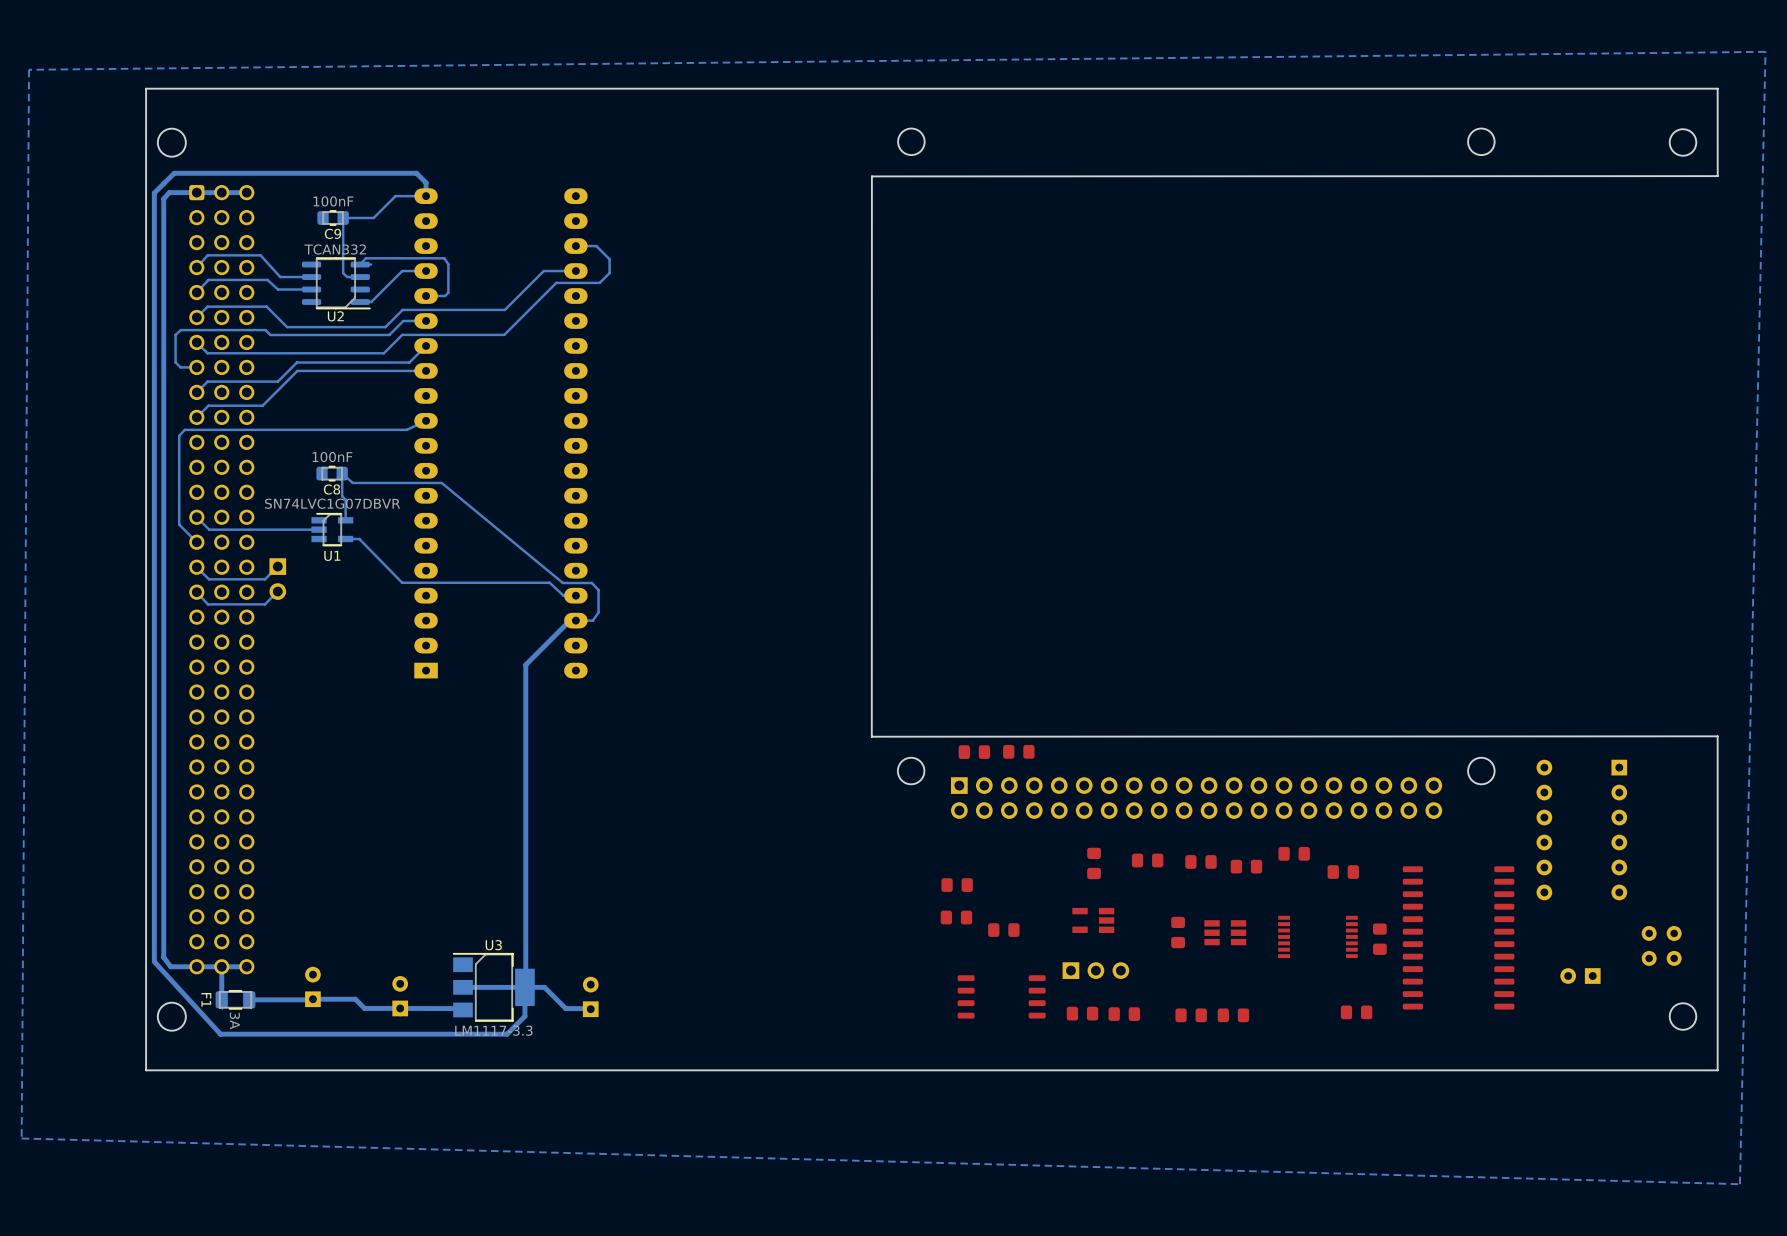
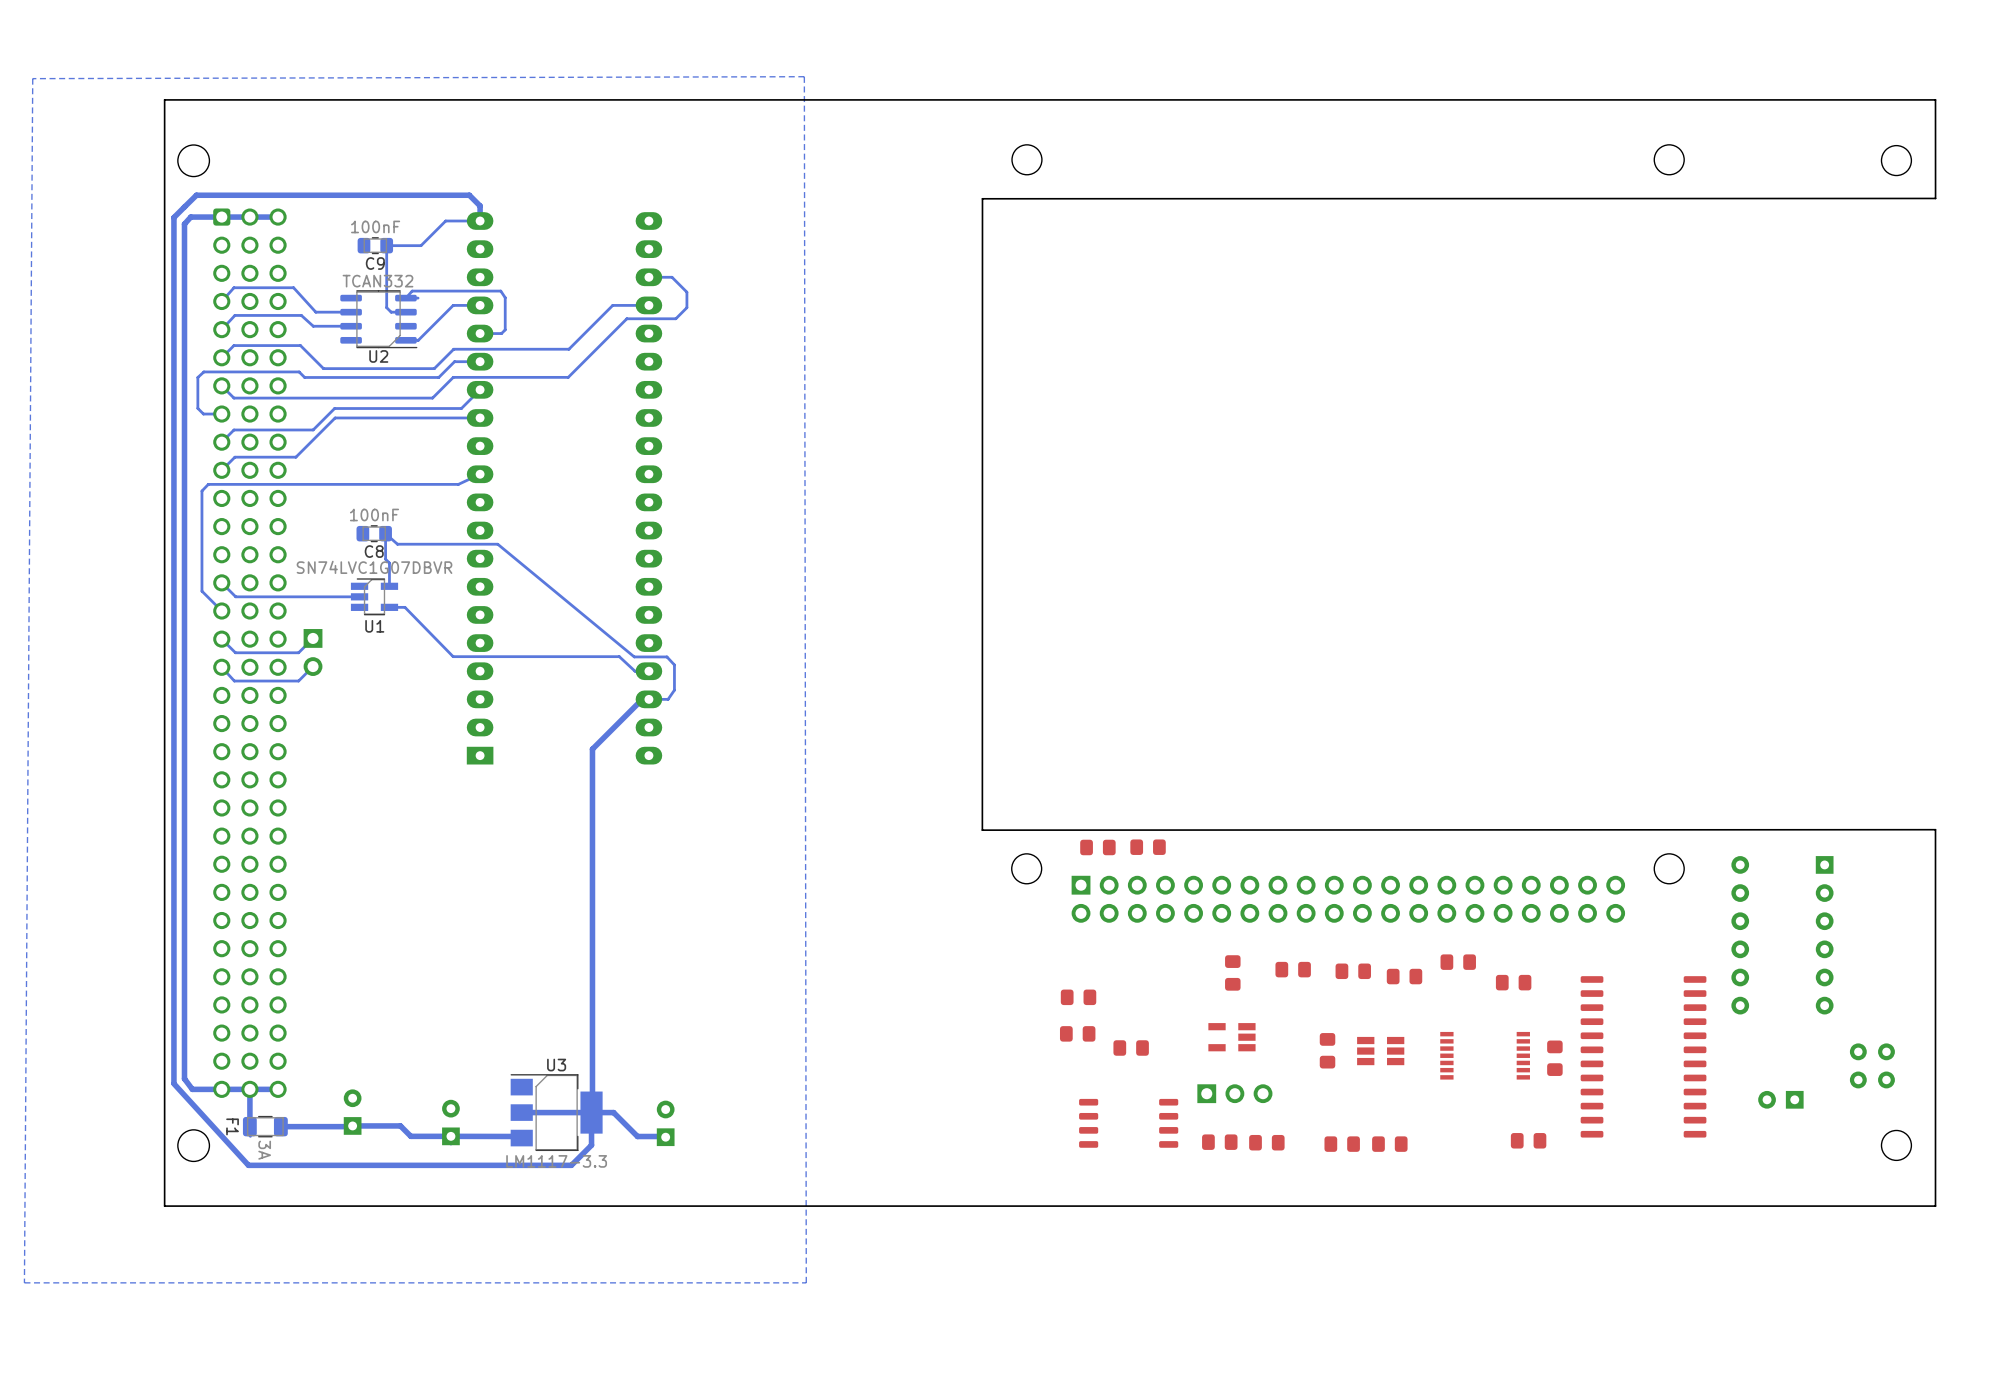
bottom zone outline: (29, 69) (1765, 51) (1739, 1184) (21, 1138) -> (32, 78) (804, 76) (806, 1282) (24, 1282)

